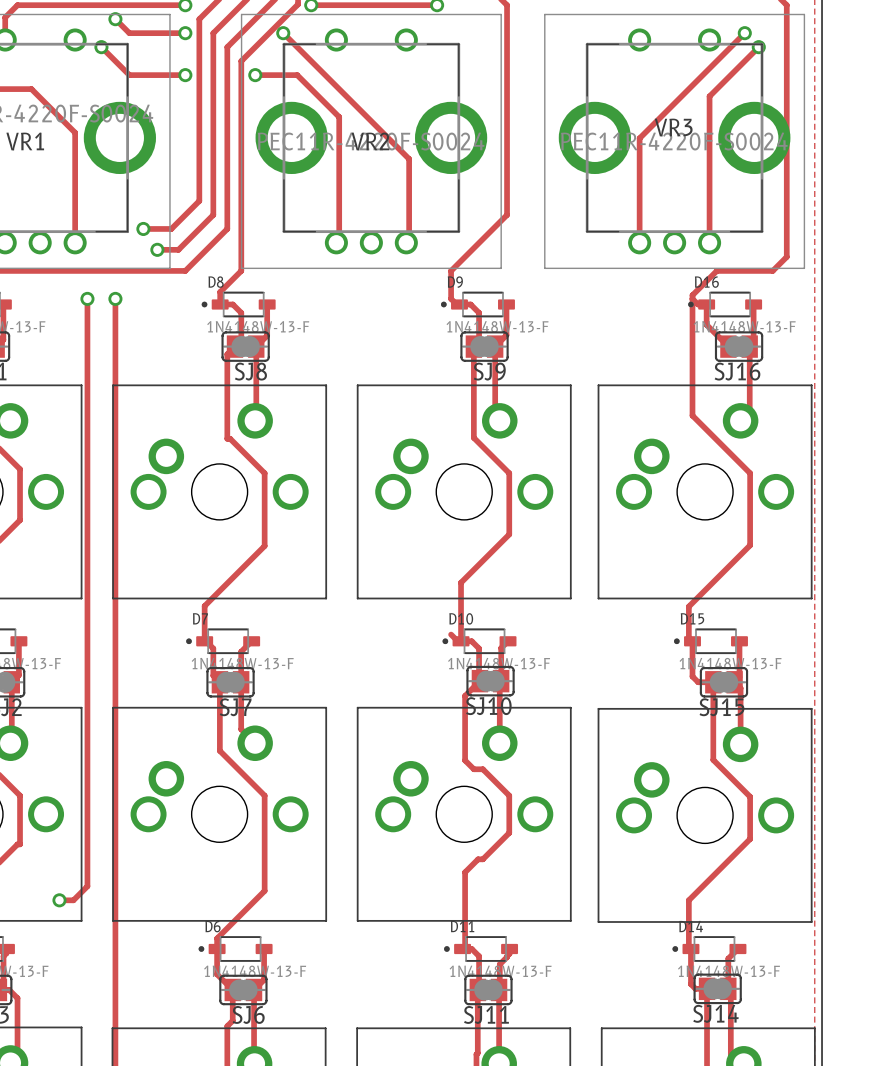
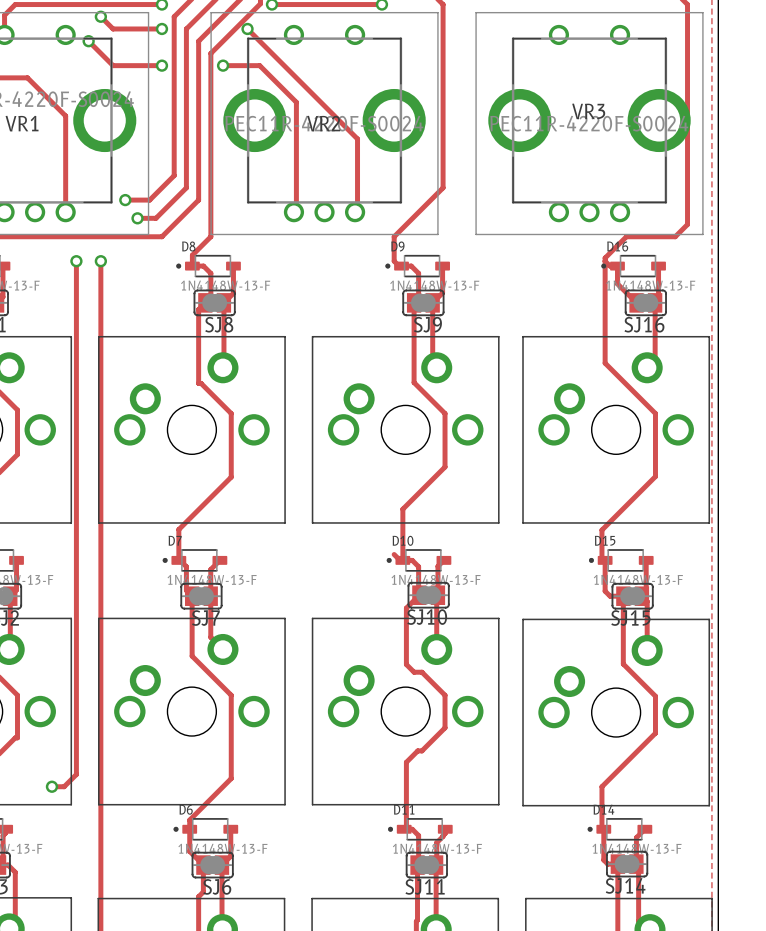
track: (744, 33) (639, 138) (639, 242) -> none
via: (744, 33) -> none
track: (758, 47) (709, 96) (709, 242) -> none
via: (758, 47) -> none

